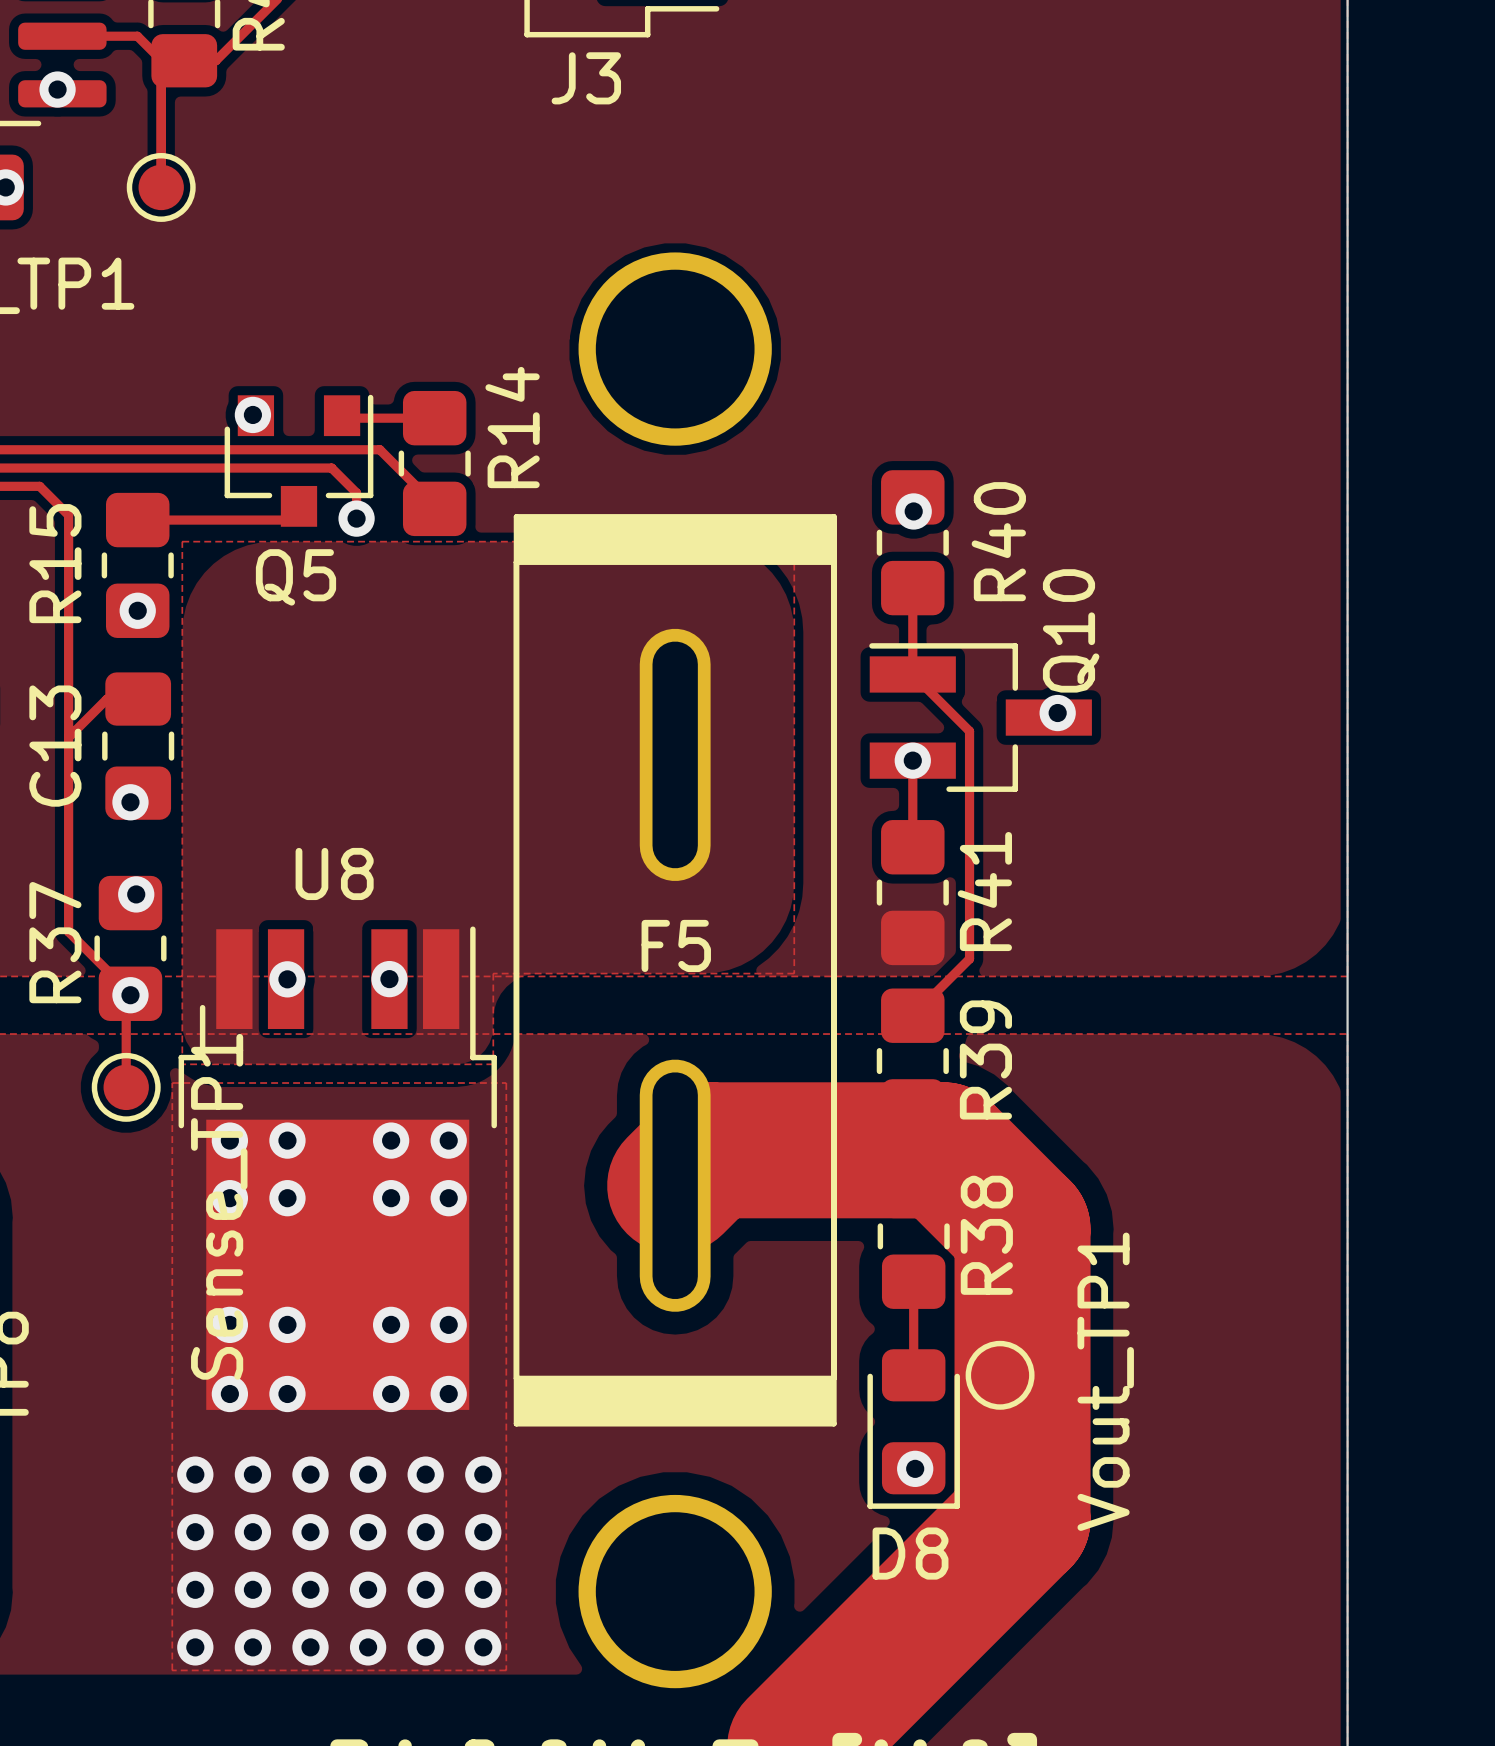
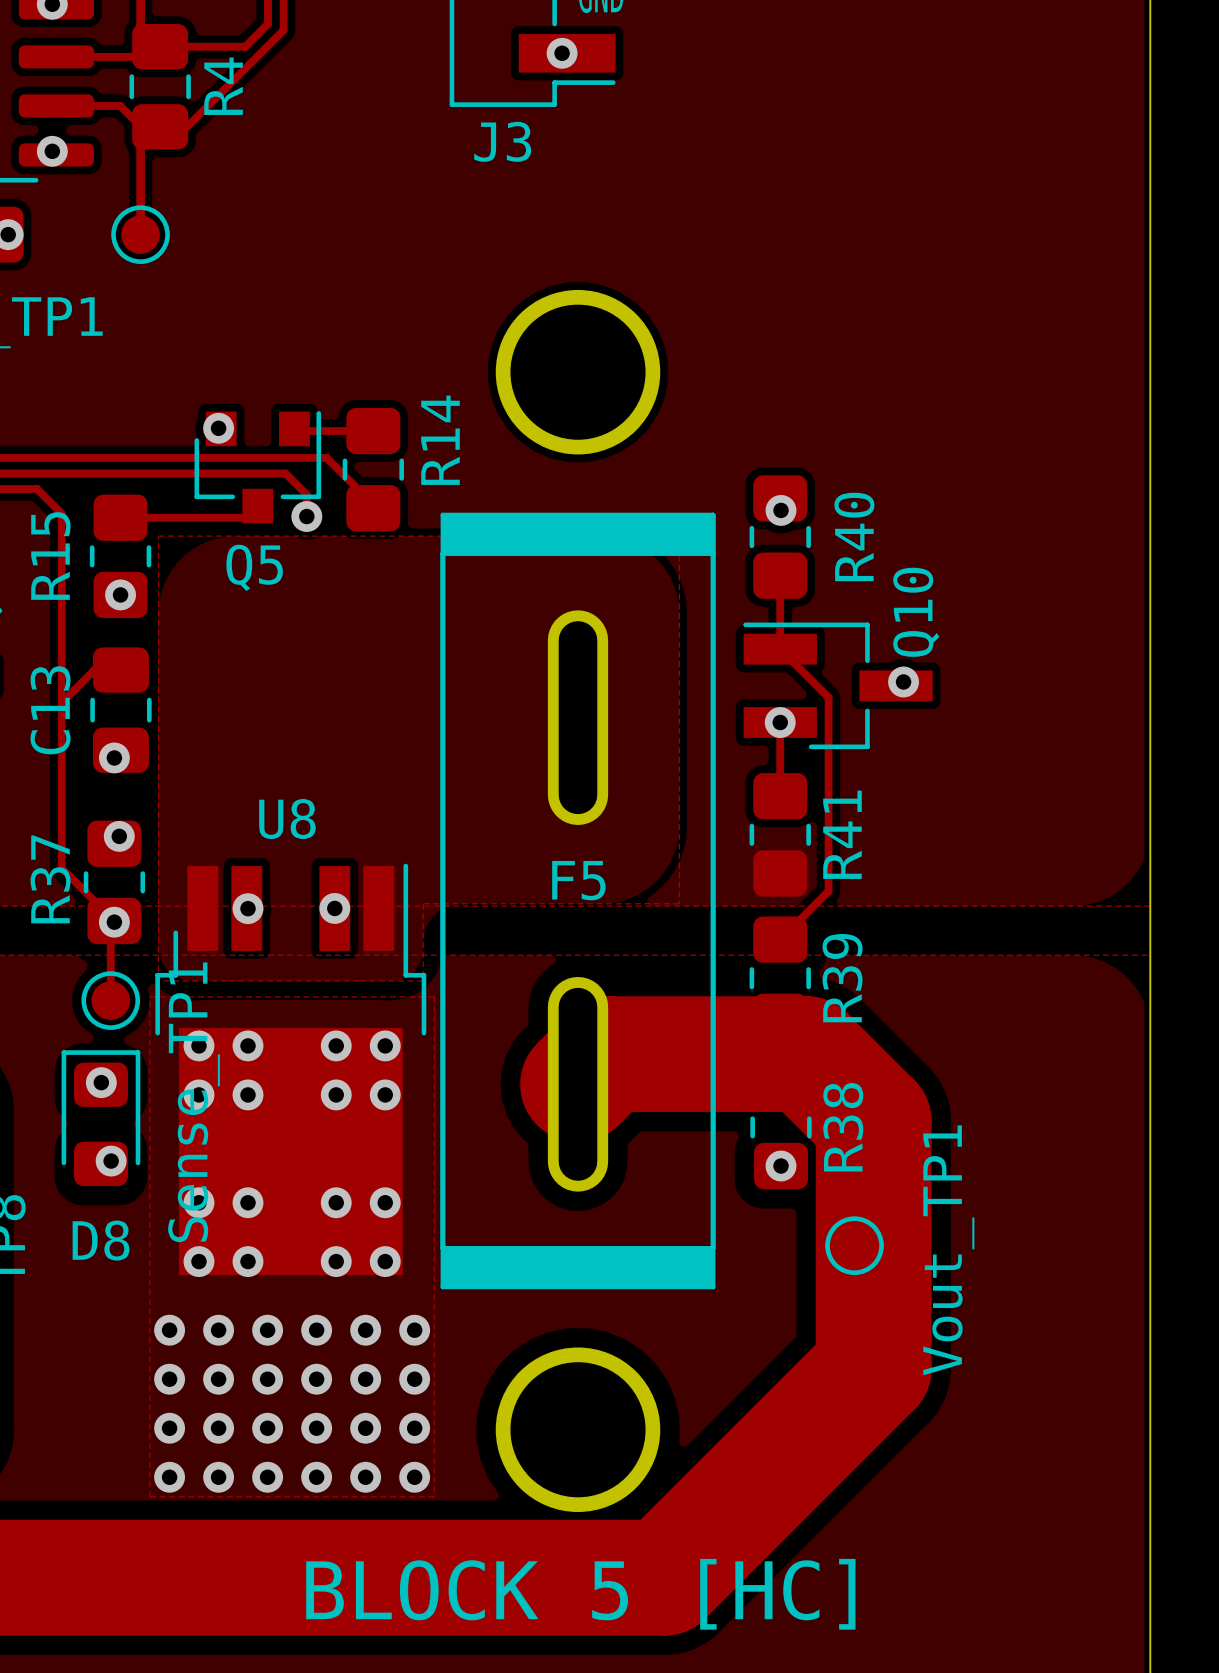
via: none -> (101, 1082)
via: none -> (111, 1161)
track: (913, 1281) (913, 1375) -> none
D8 rotation: 0° (913, 1429) -> 180° (100, 1118)
D8 position: (913, 1429) -> (100, 1118)
via position: (915, 1468) -> (781, 1166)

